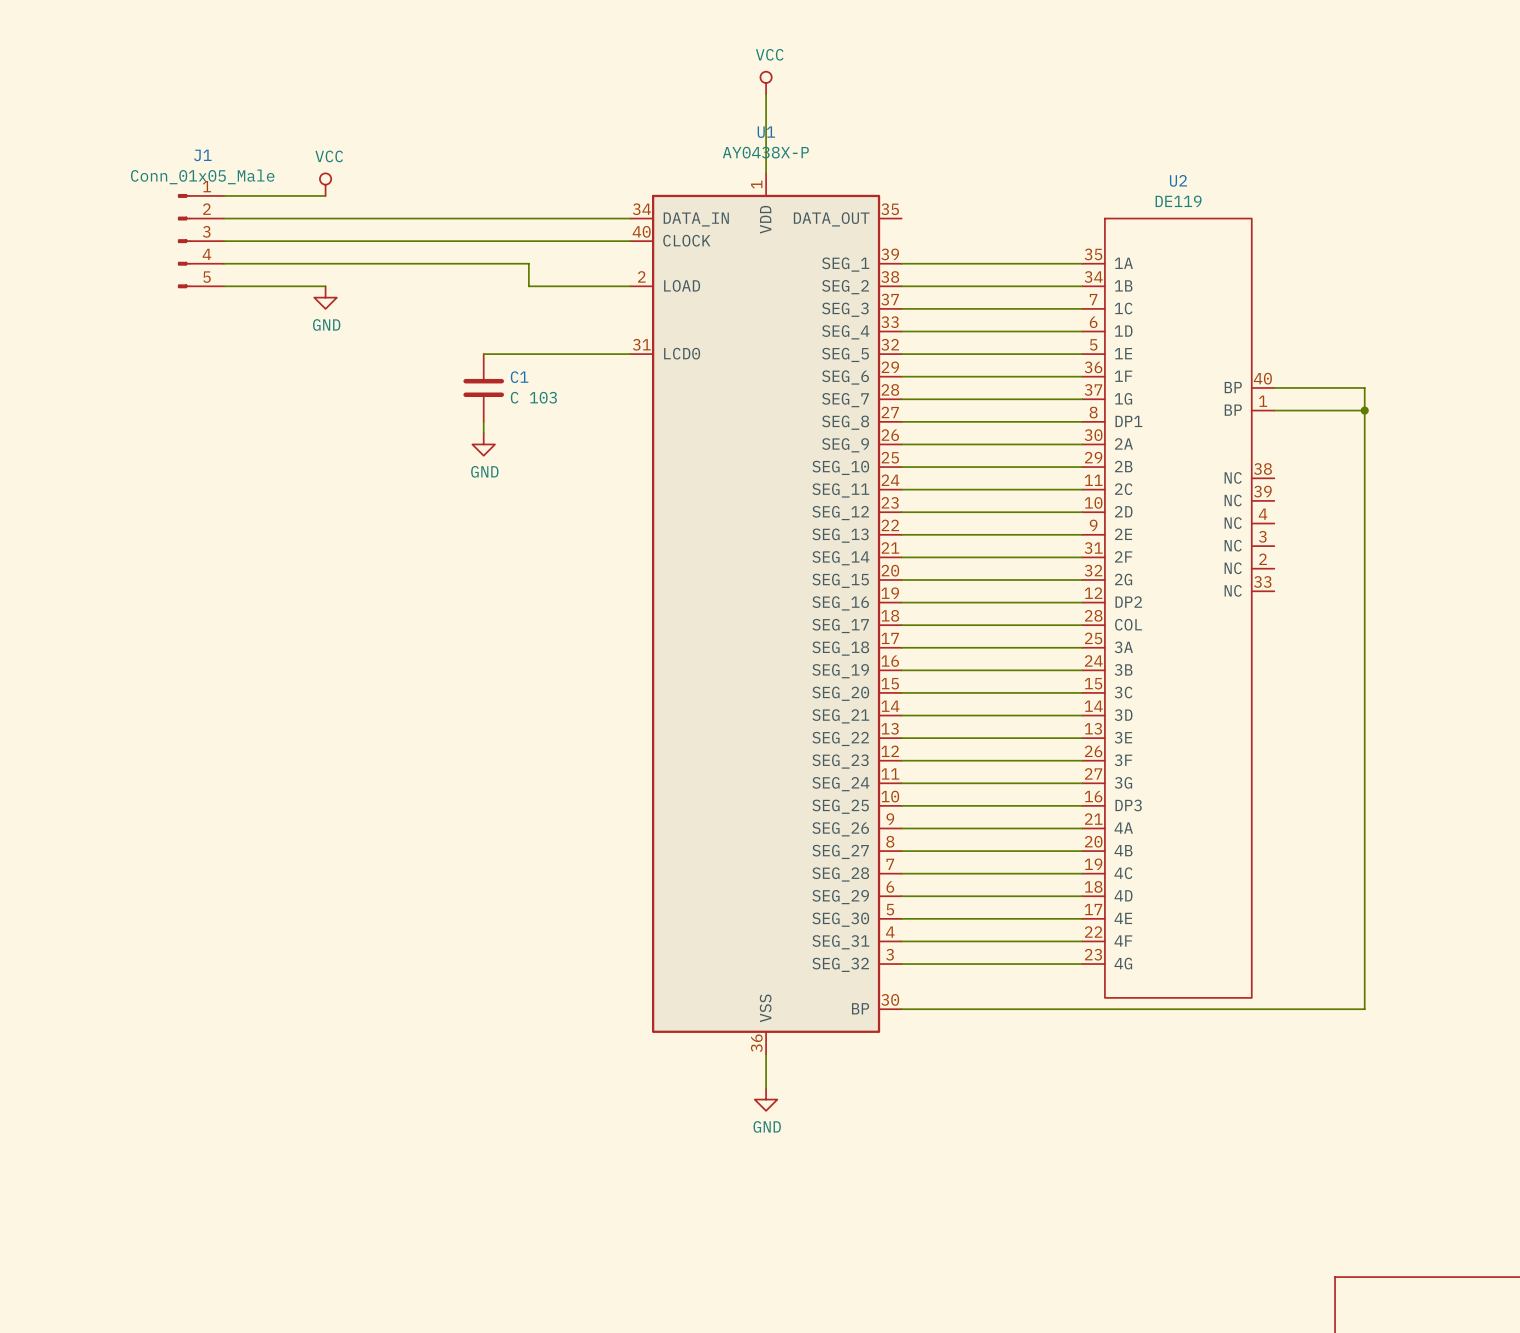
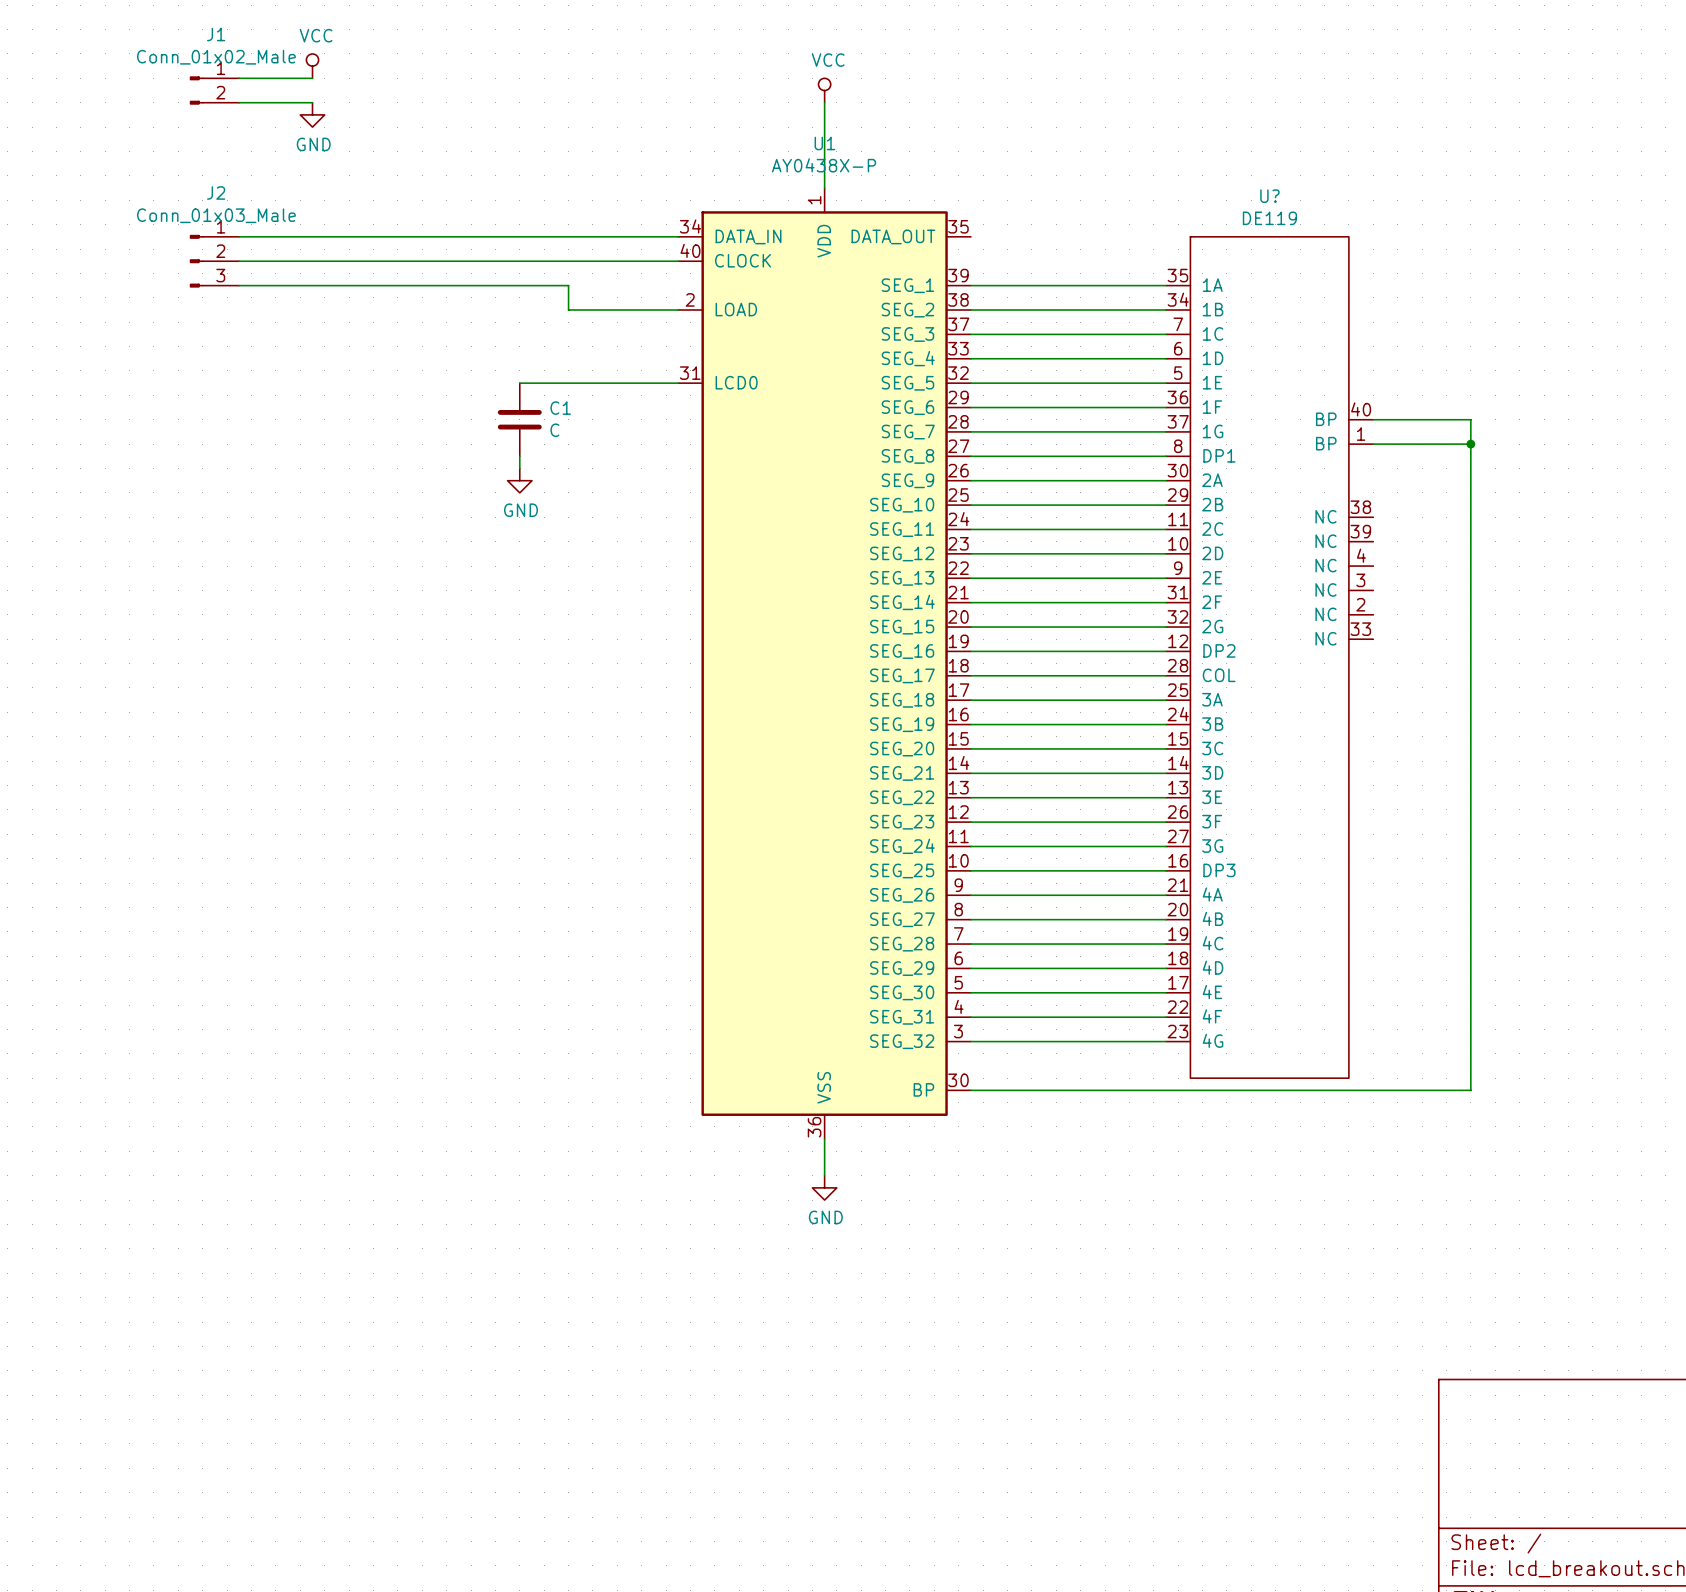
wire: none -> (239, 78) (312, 78)
wire: none -> (239, 102) (312, 102)
J1 name position: J1 (202, 155) -> J1 (216, 34)
J1 value: Conn_01x05_Male (202, 176) -> Conn_01x02_Male (216, 57)
U2 name: U2 (1178, 180) -> U? (1269, 196)
power symbol position: VCC (325, 184) -> VCC (312, 66)
J1 symbol: [178, 194, 224, 289] -> [189, 76, 240, 105]
wire: (223, 195) (325, 195) -> none
J2: none -> Conn_01x03_Male (214, 261)
wire: (223, 286) (325, 286) -> none
power symbol position: GND (325, 297) -> GND (312, 114)
C1 value: C 103 (533, 397) -> C (554, 430)

